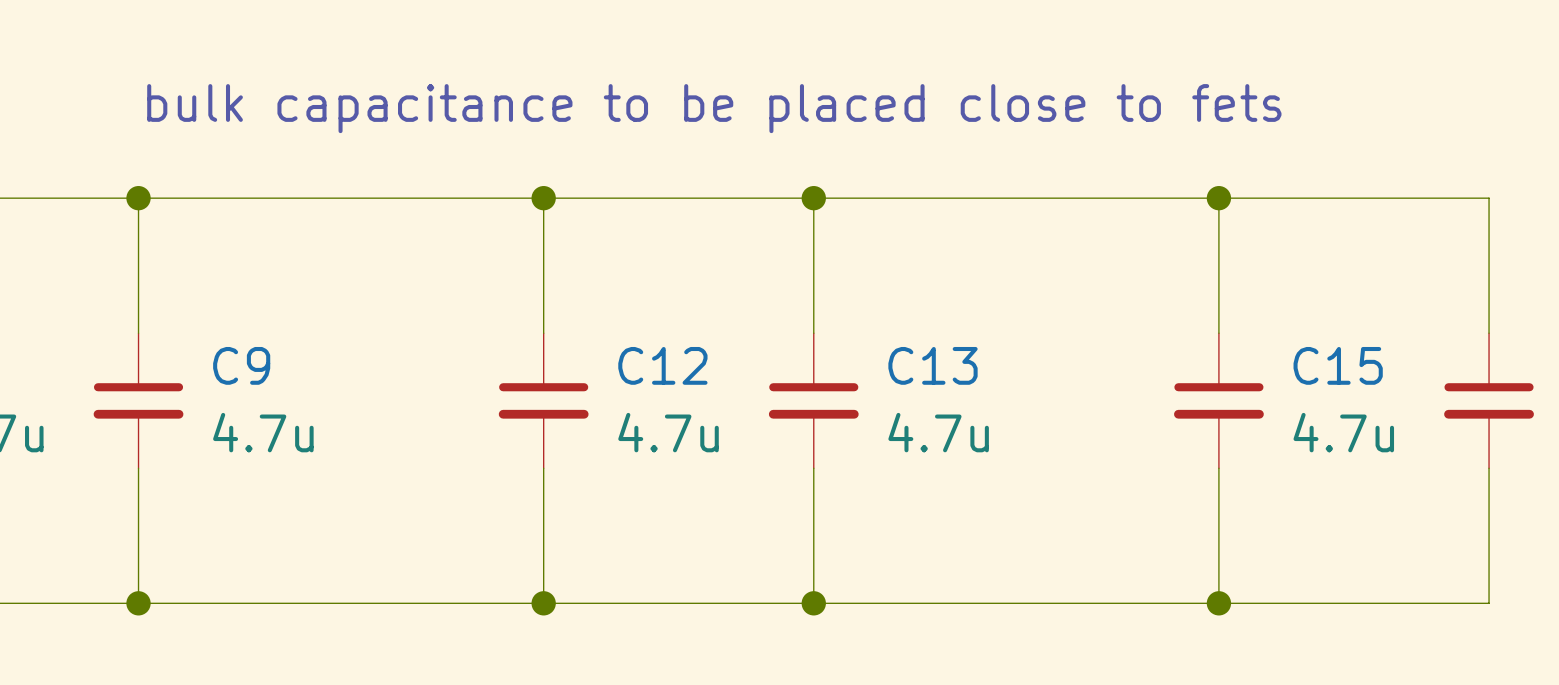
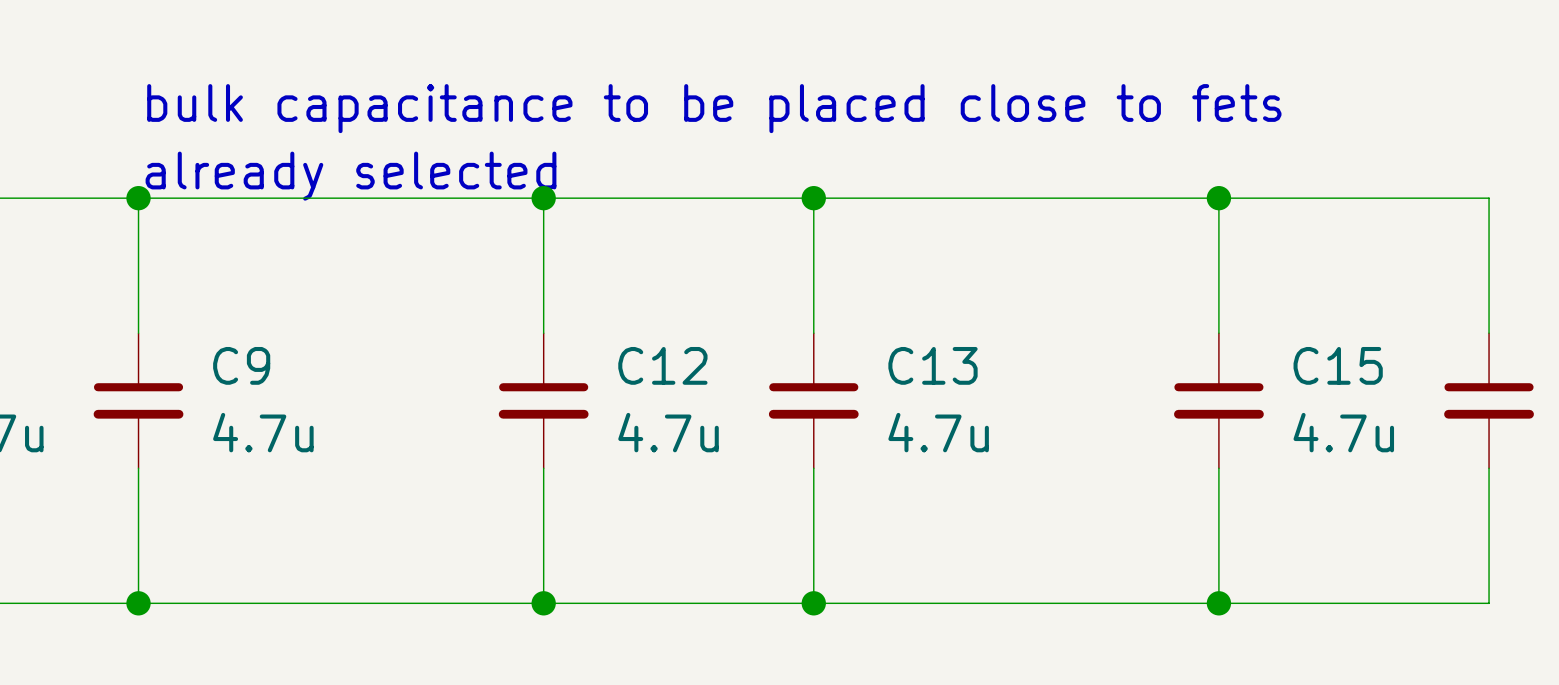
text: none -> already selected (351, 176)

